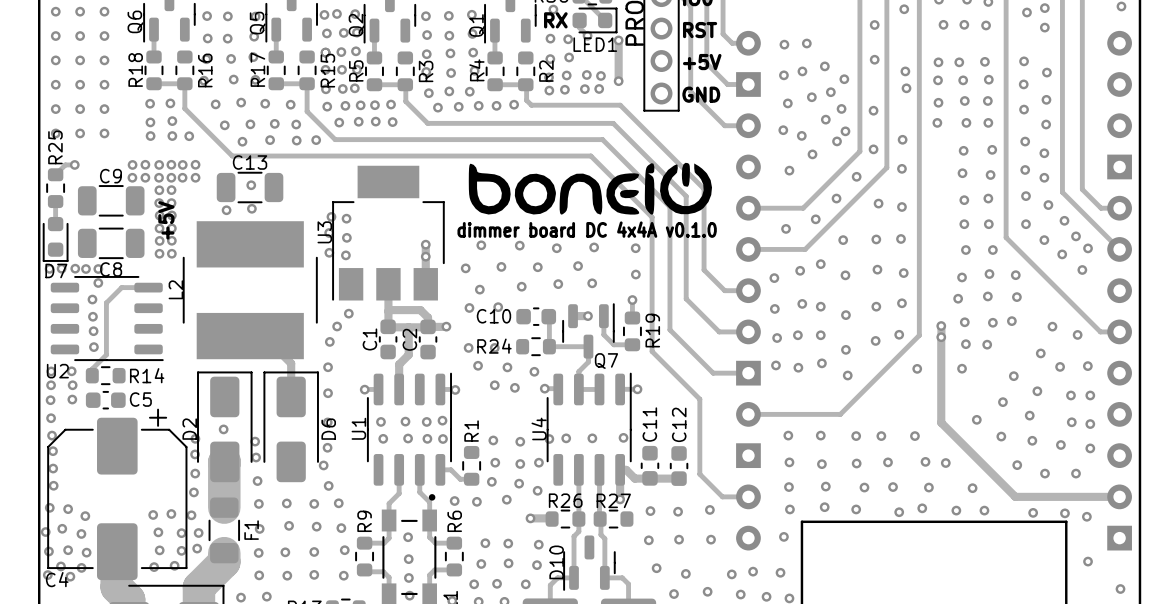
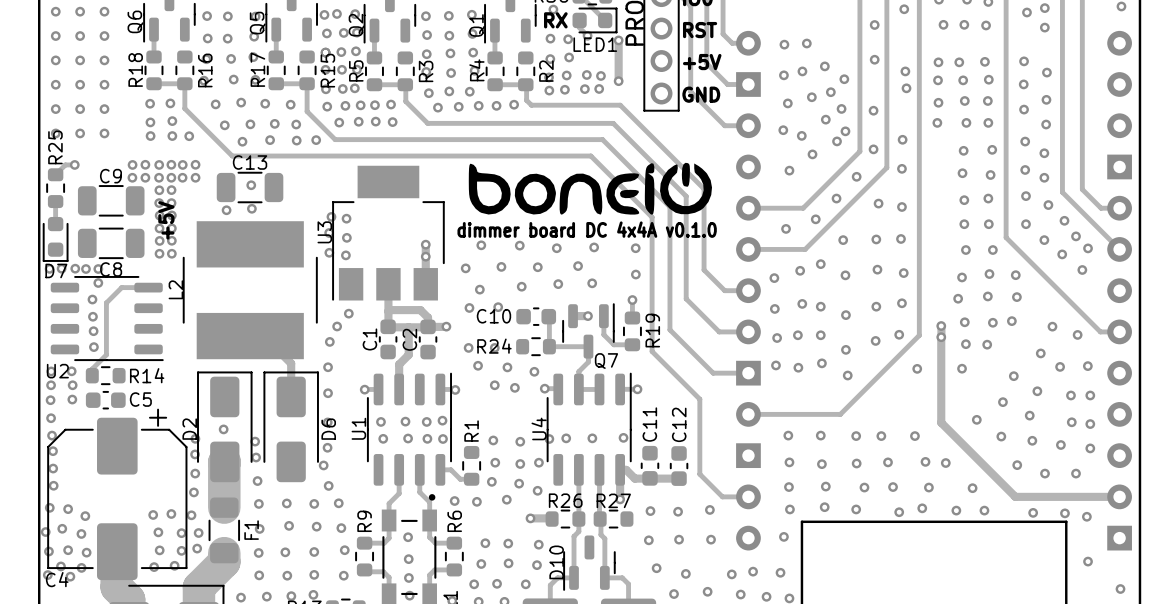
via: none -> (313, 594)
via: none -> (291, 596)

